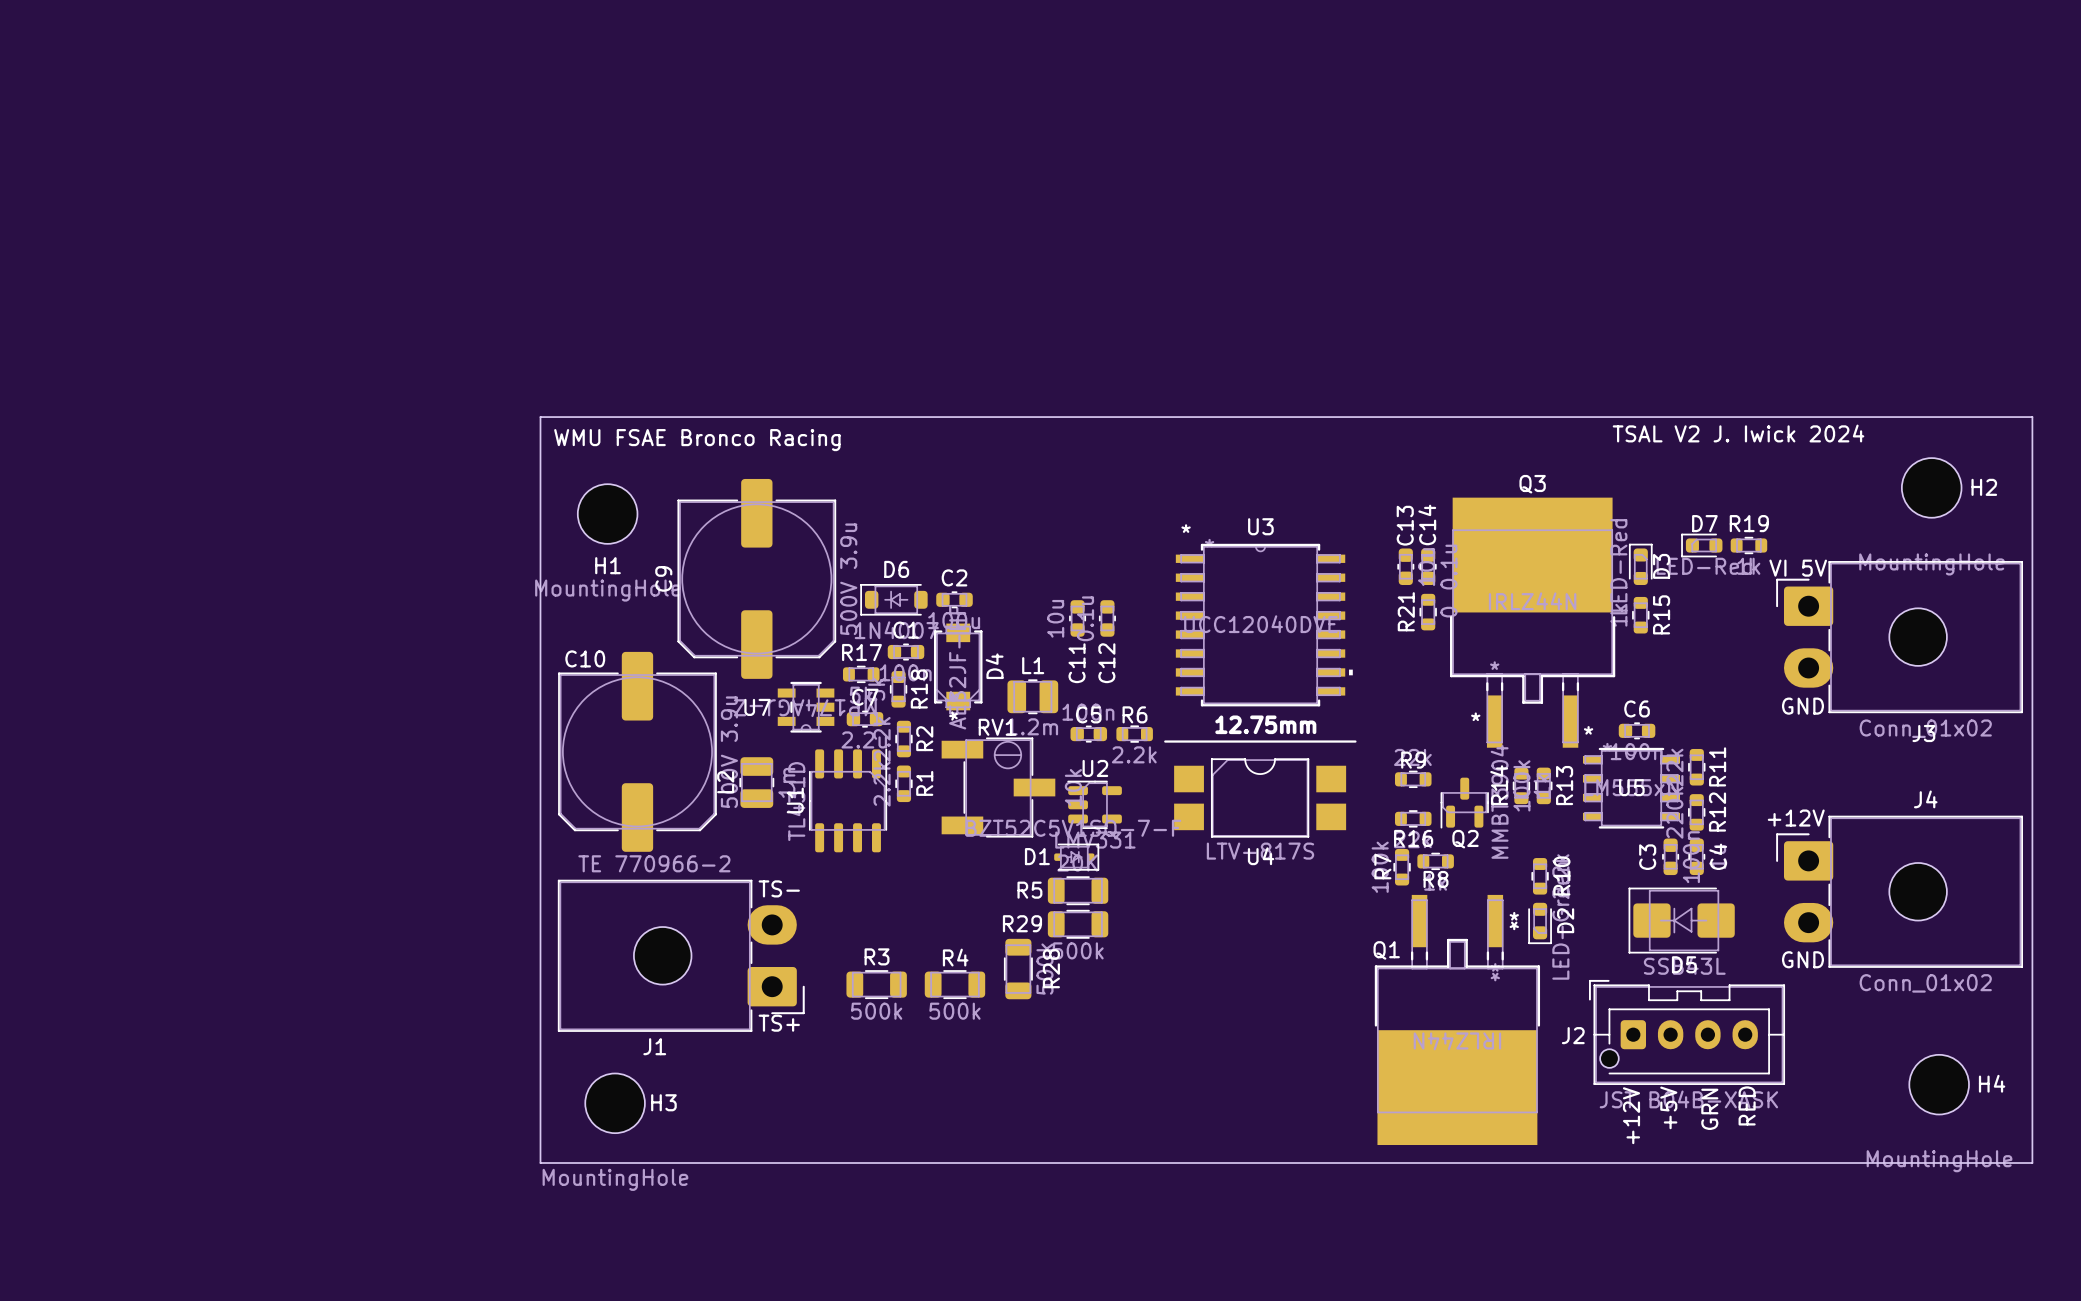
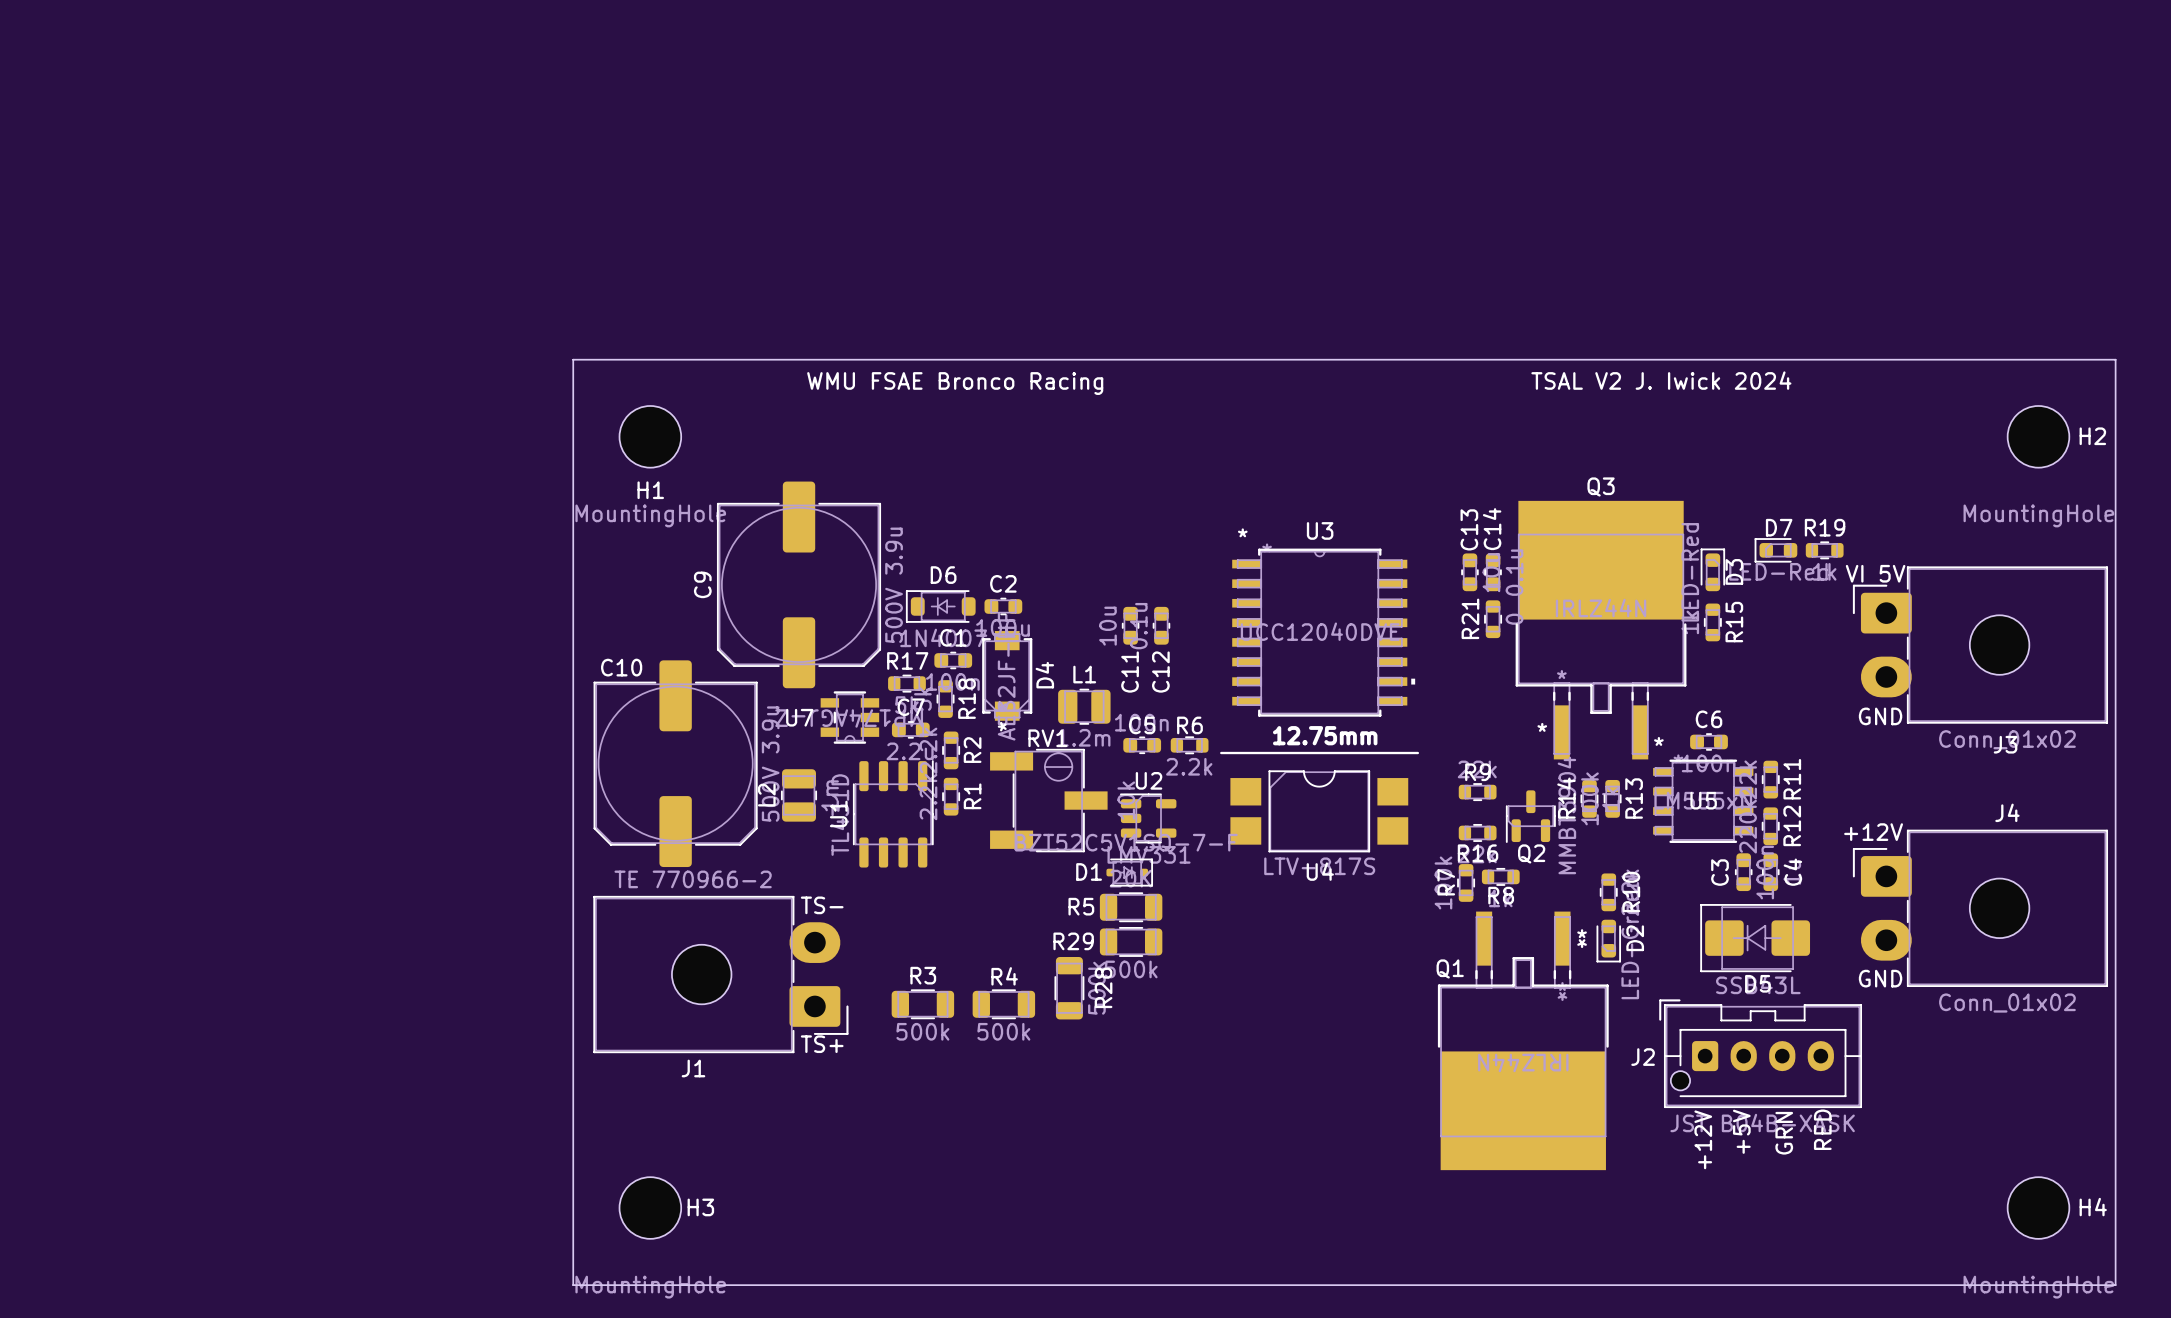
board edge: (540, 417) (540, 1163) (2032, 1163) (2032, 417) (540, 417) -> (573, 359) (573, 1285) (2115, 1285) (2115, 359) (573, 359)
text position: TSAL V2 J. Iwick 2024 (1738, 433) -> TSAL V2 J. Iwick 2024 (1661, 380)
text position: WMU FSAE Bronco Racing (697, 440) -> WMU FSAE Bronco Racing (955, 383)
H2 position: (1931, 487) -> (2038, 436)
H1 position: (607, 514) -> (650, 436)
H4 position: (1939, 1084) -> (2038, 1208)
H3 position: (615, 1103) -> (650, 1208)

